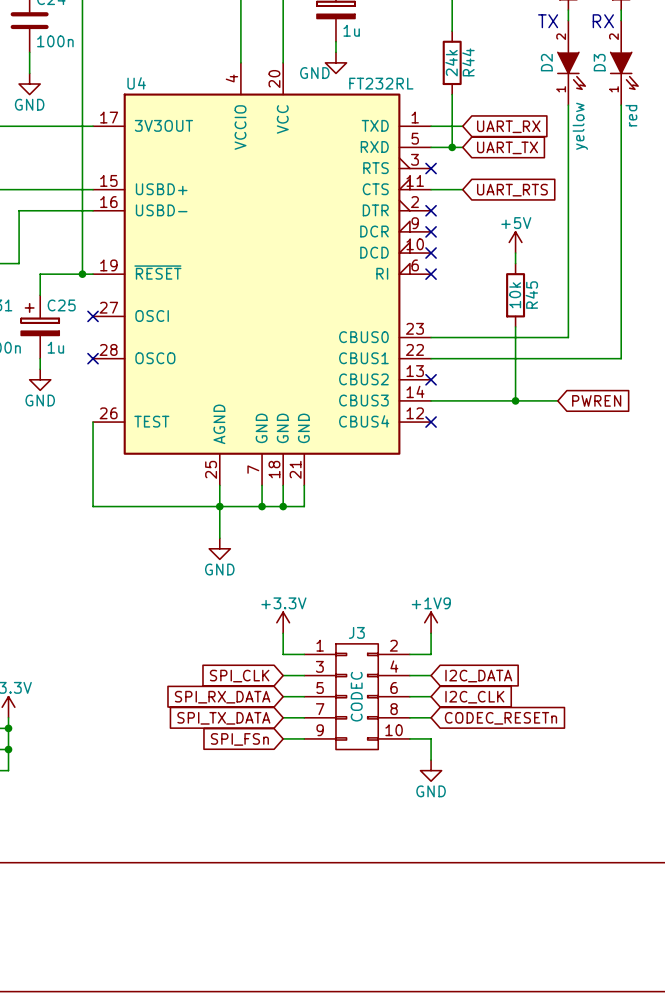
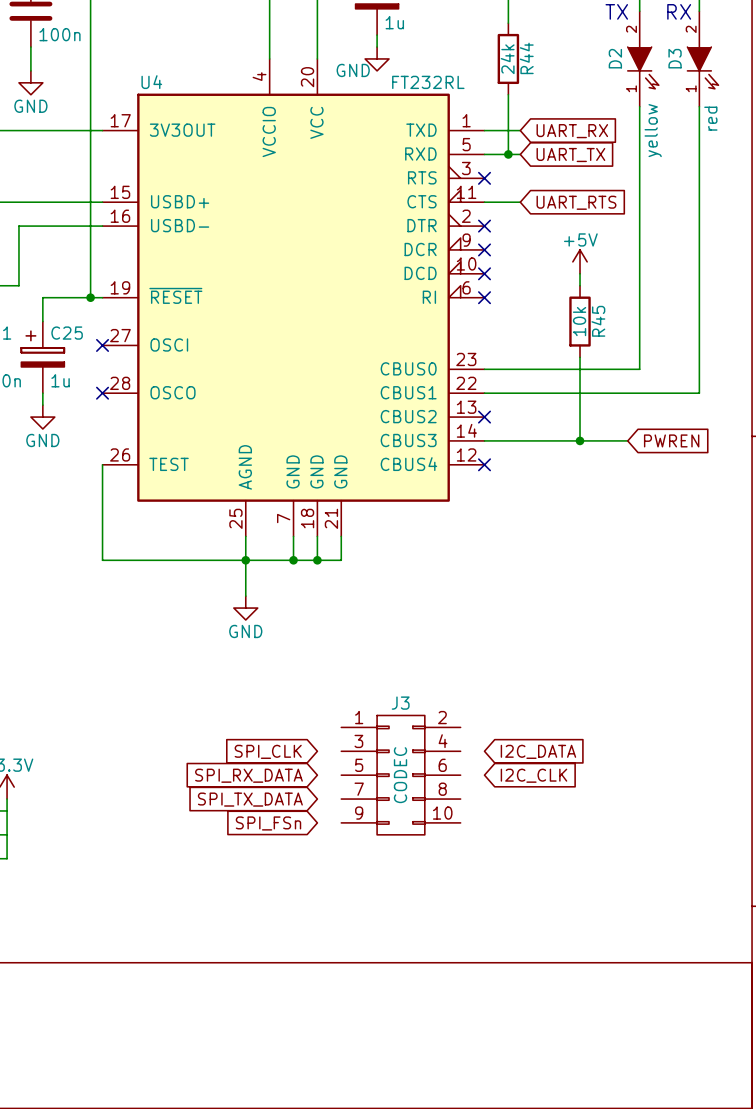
power symbol: +3.3V (283, 622) -> none
power symbol: +1V9 (431, 622) -> none
wire: (283, 633) (283, 654) (304, 654) -> none
wire: (431, 633) (431, 654) (409, 654) -> none
wire: (283, 675) (304, 675) -> none
wire: (409, 675) (431, 675) -> none
wire: (283, 696) (304, 696) -> none
wire: (409, 696) (431, 696) -> none
wire: (283, 717) (304, 717) -> none
wire: (409, 717) (431, 717) -> none
global label: CODEC_RESETn (500, 718) -> none
junction: (8, 728) -> none
wire: (283, 738) (304, 738) -> none
wire: (409, 738) (431, 738) (431, 760) -> none
junction: (8, 749) -> none
power symbol: GND (431, 770) -> none

